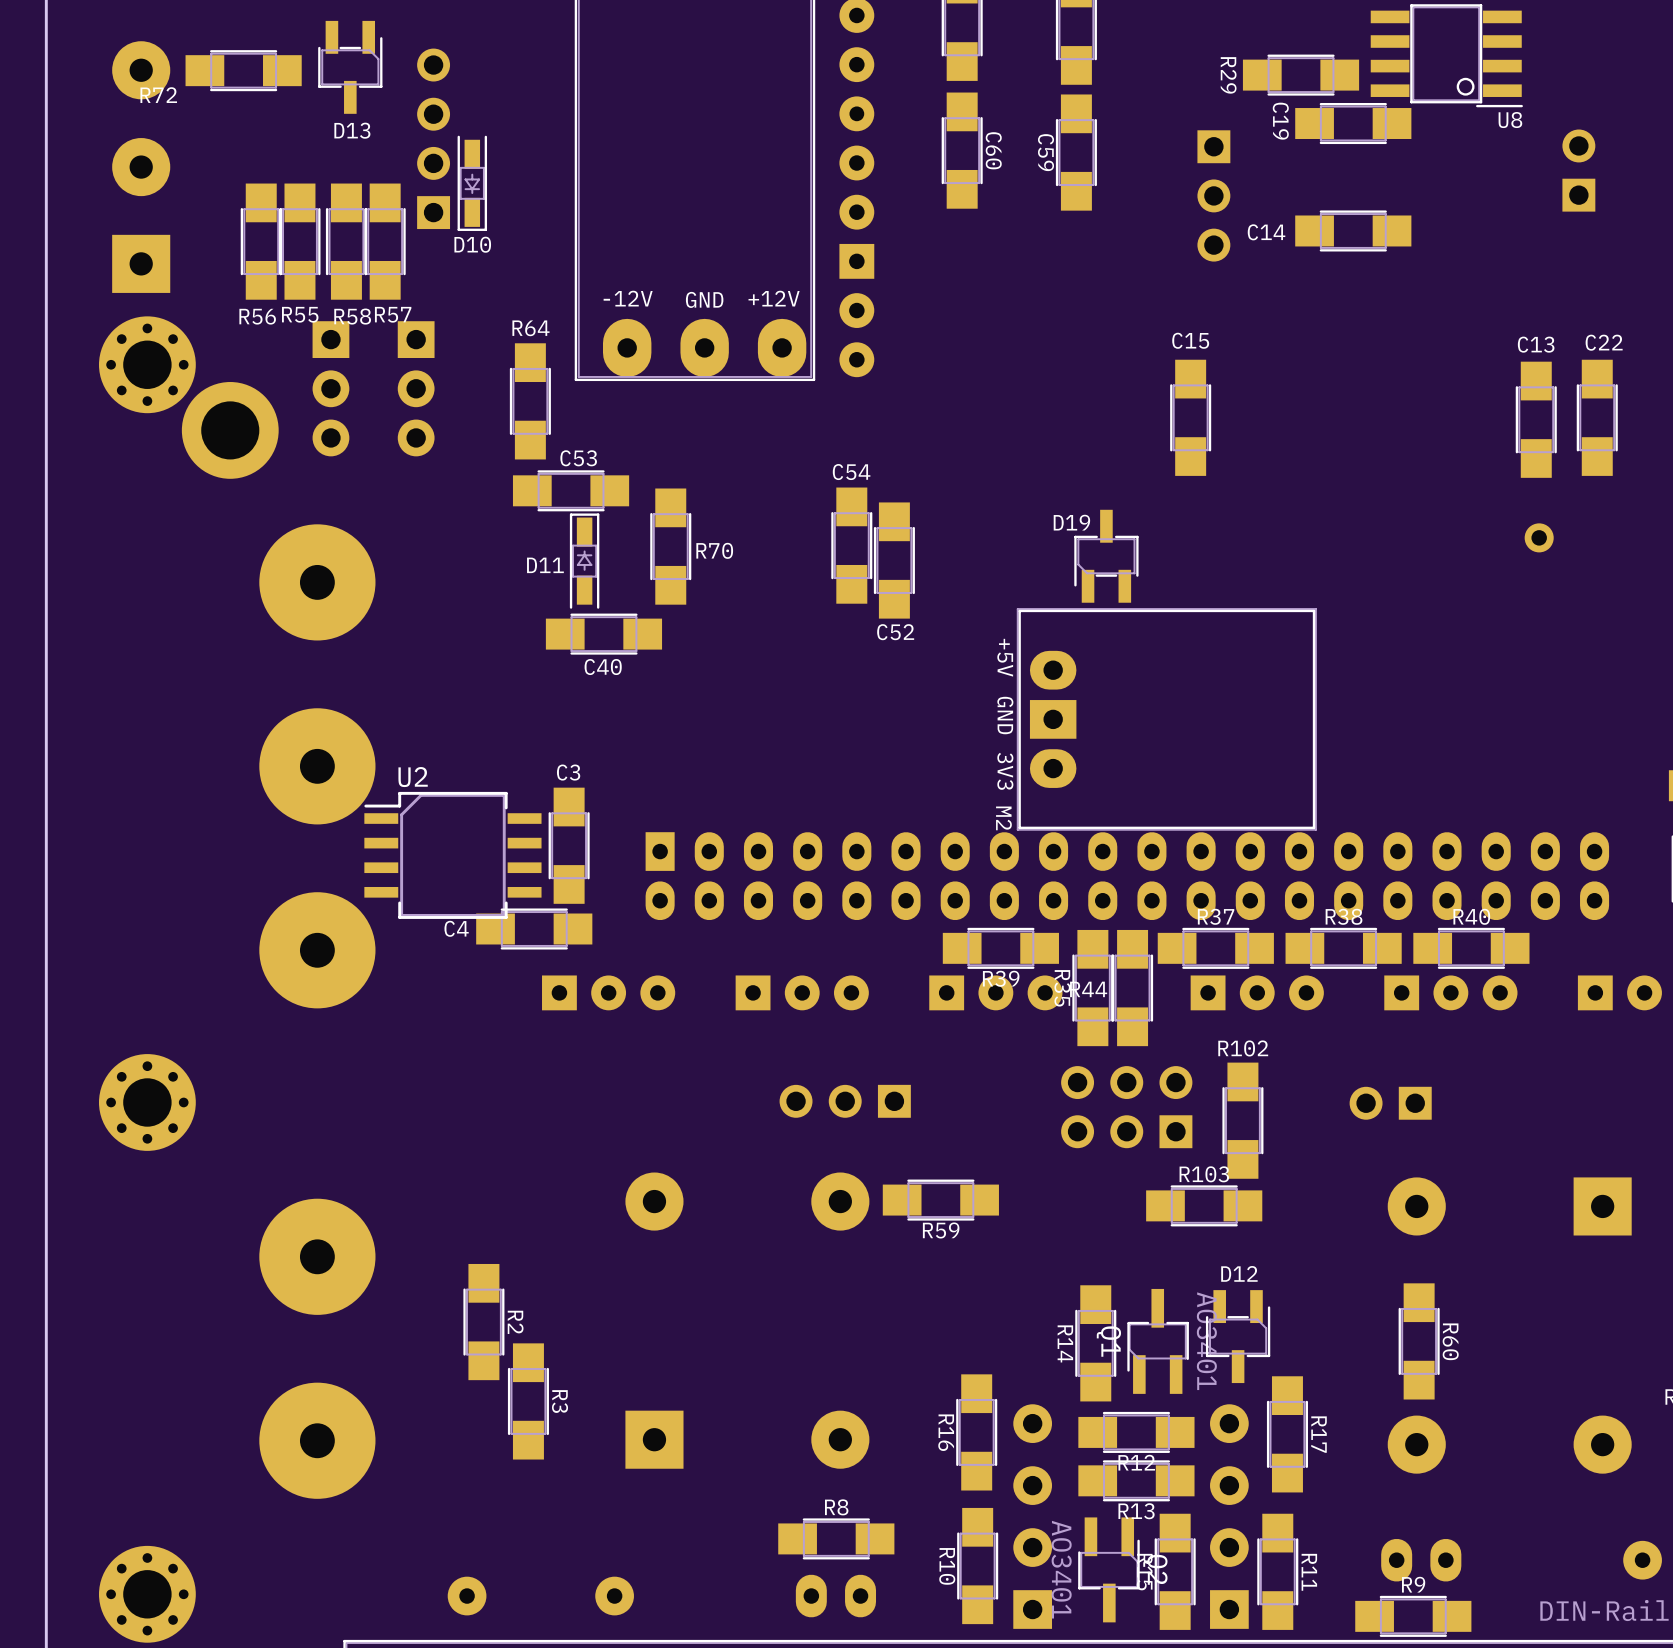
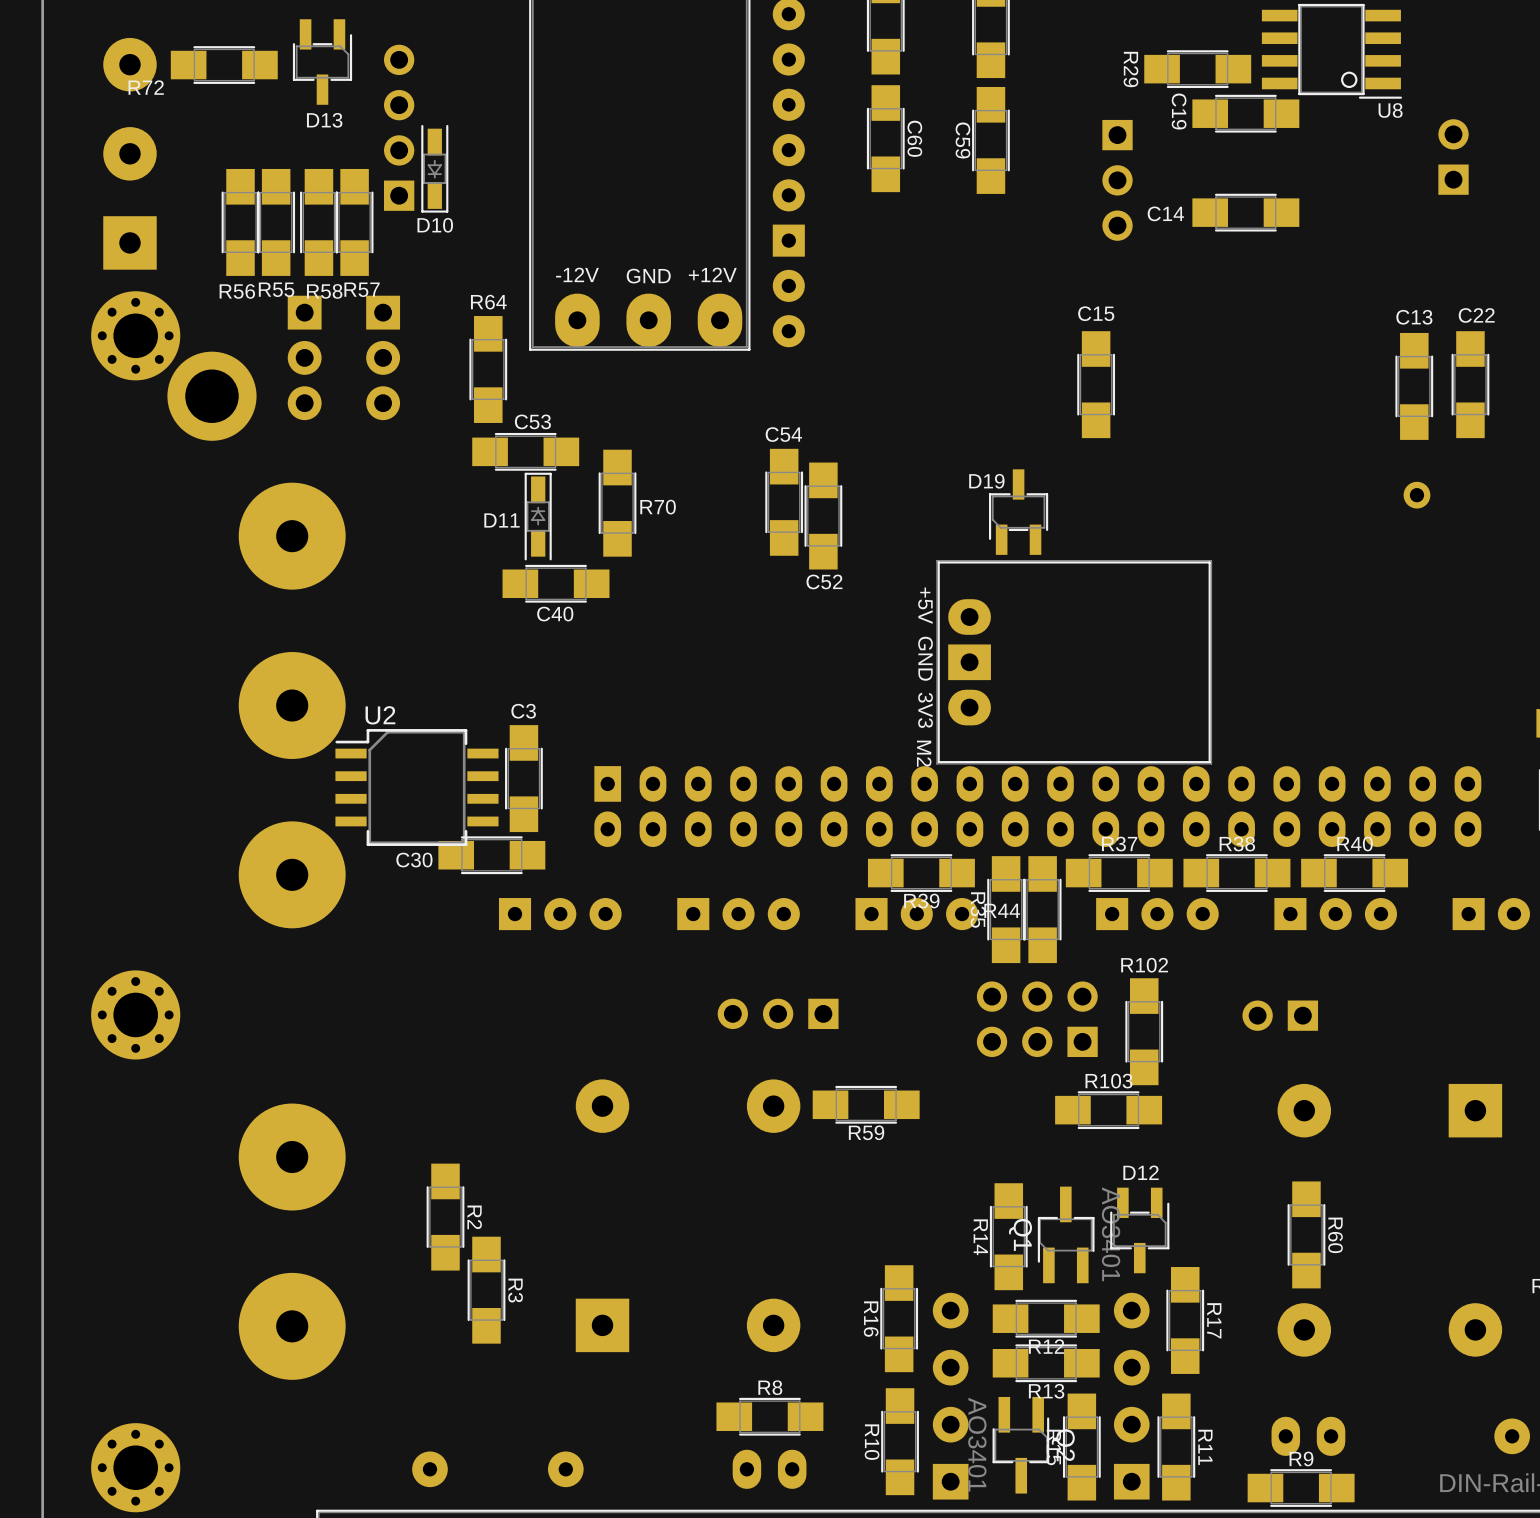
C4 name: C4 (456, 928) -> C30 (414, 860)

